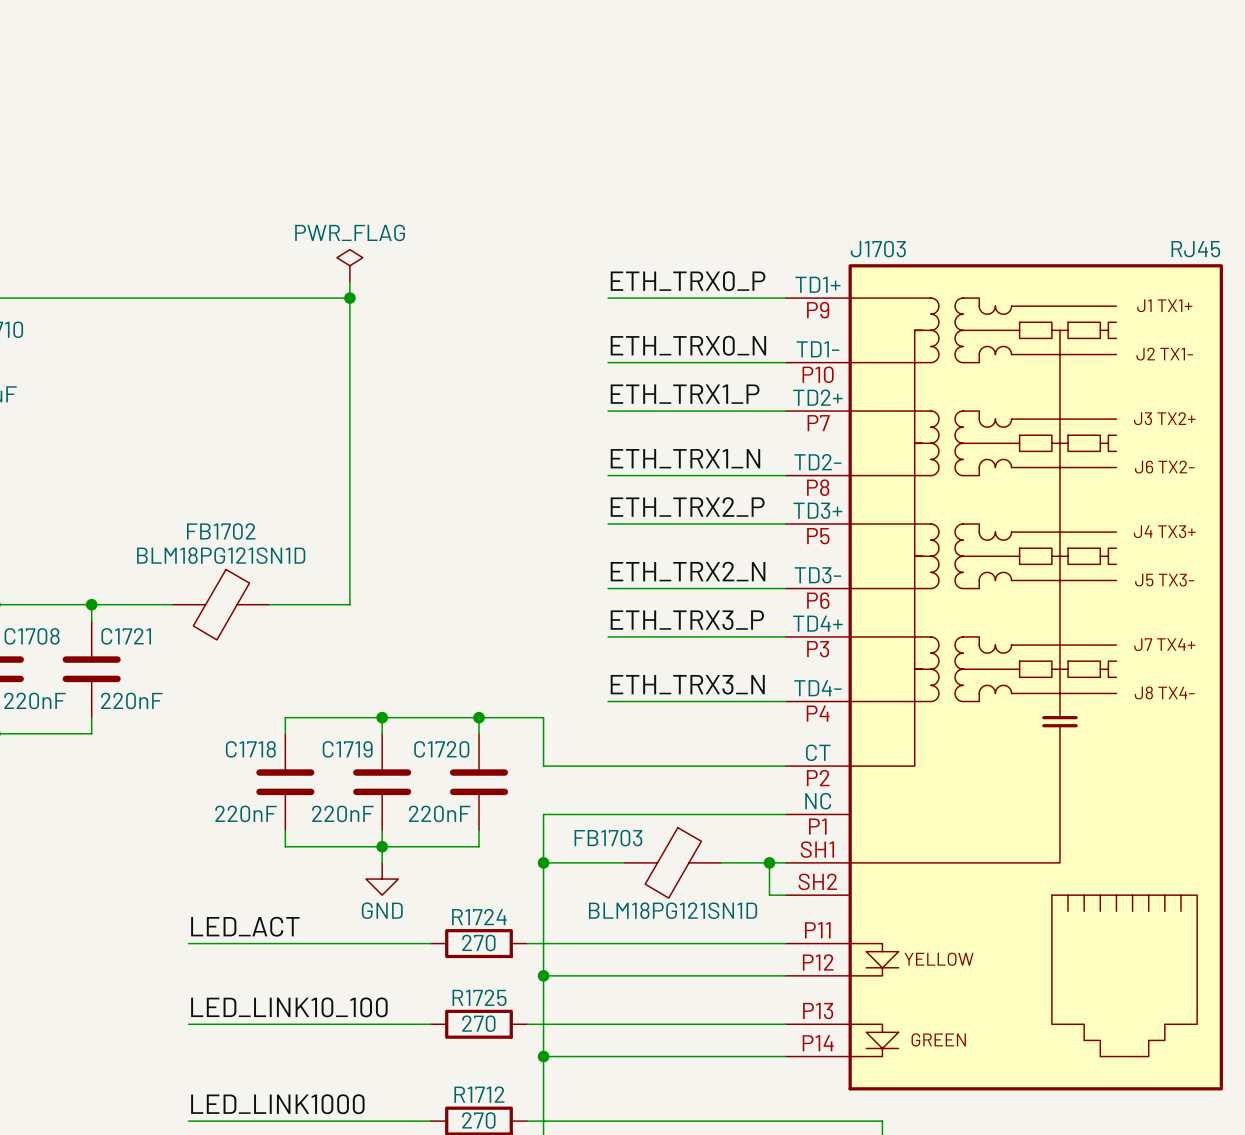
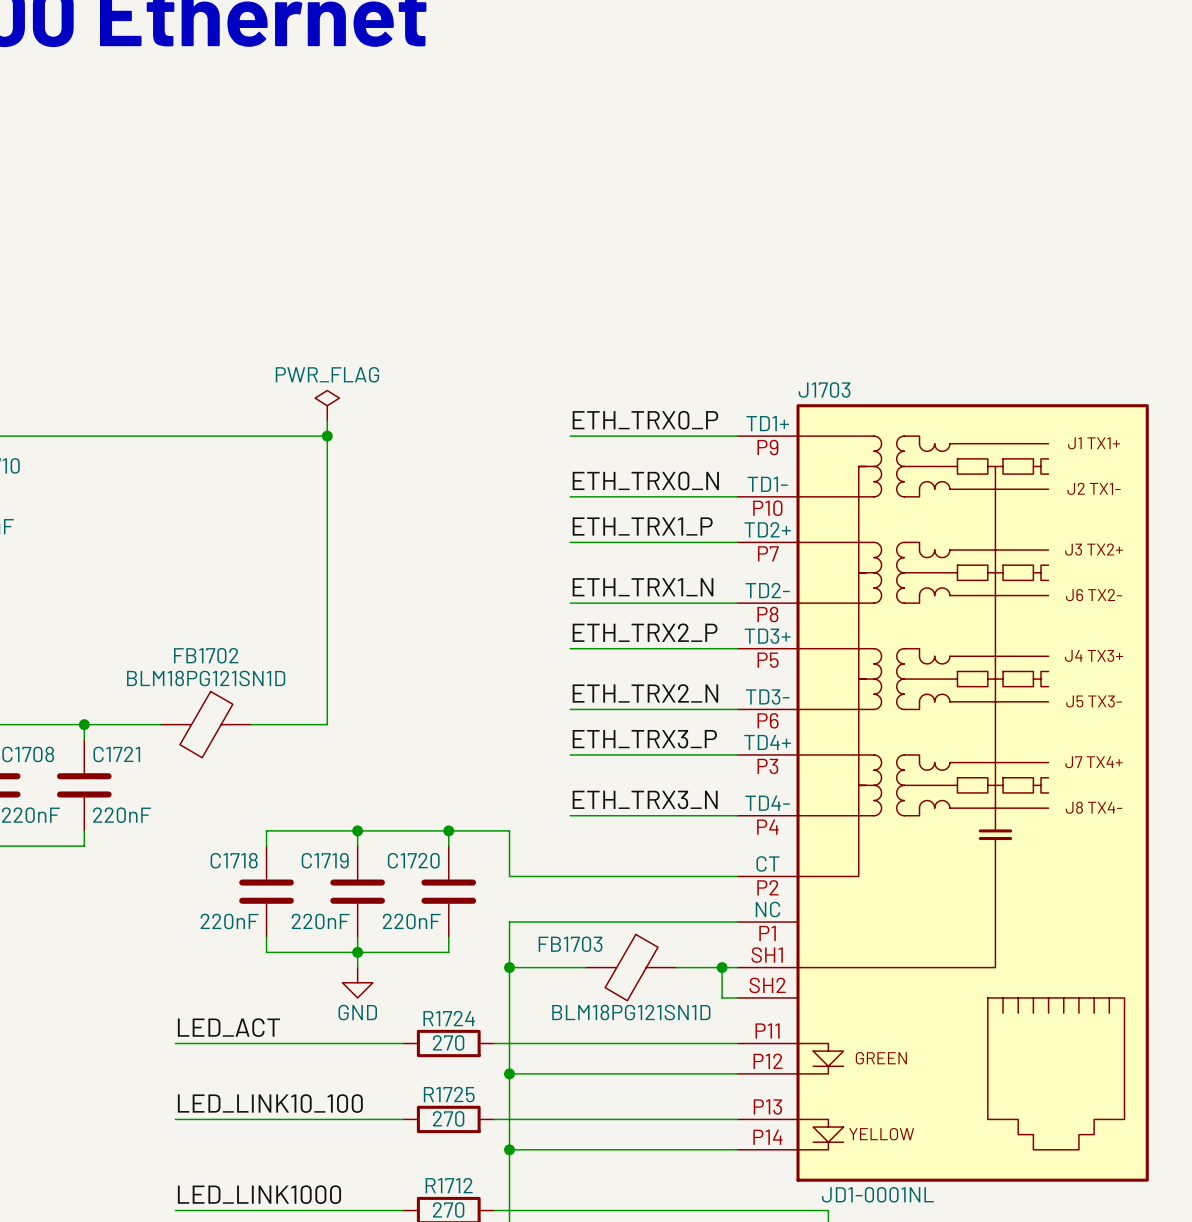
J1703 value: RJ45 (1195, 249) -> JD1-0001NL (877, 1194)
J1703 text: YELLOW (939, 959) -> GREEN (881, 1058)
J1703 text: GREEN (938, 1039) -> YELLOW (881, 1134)

